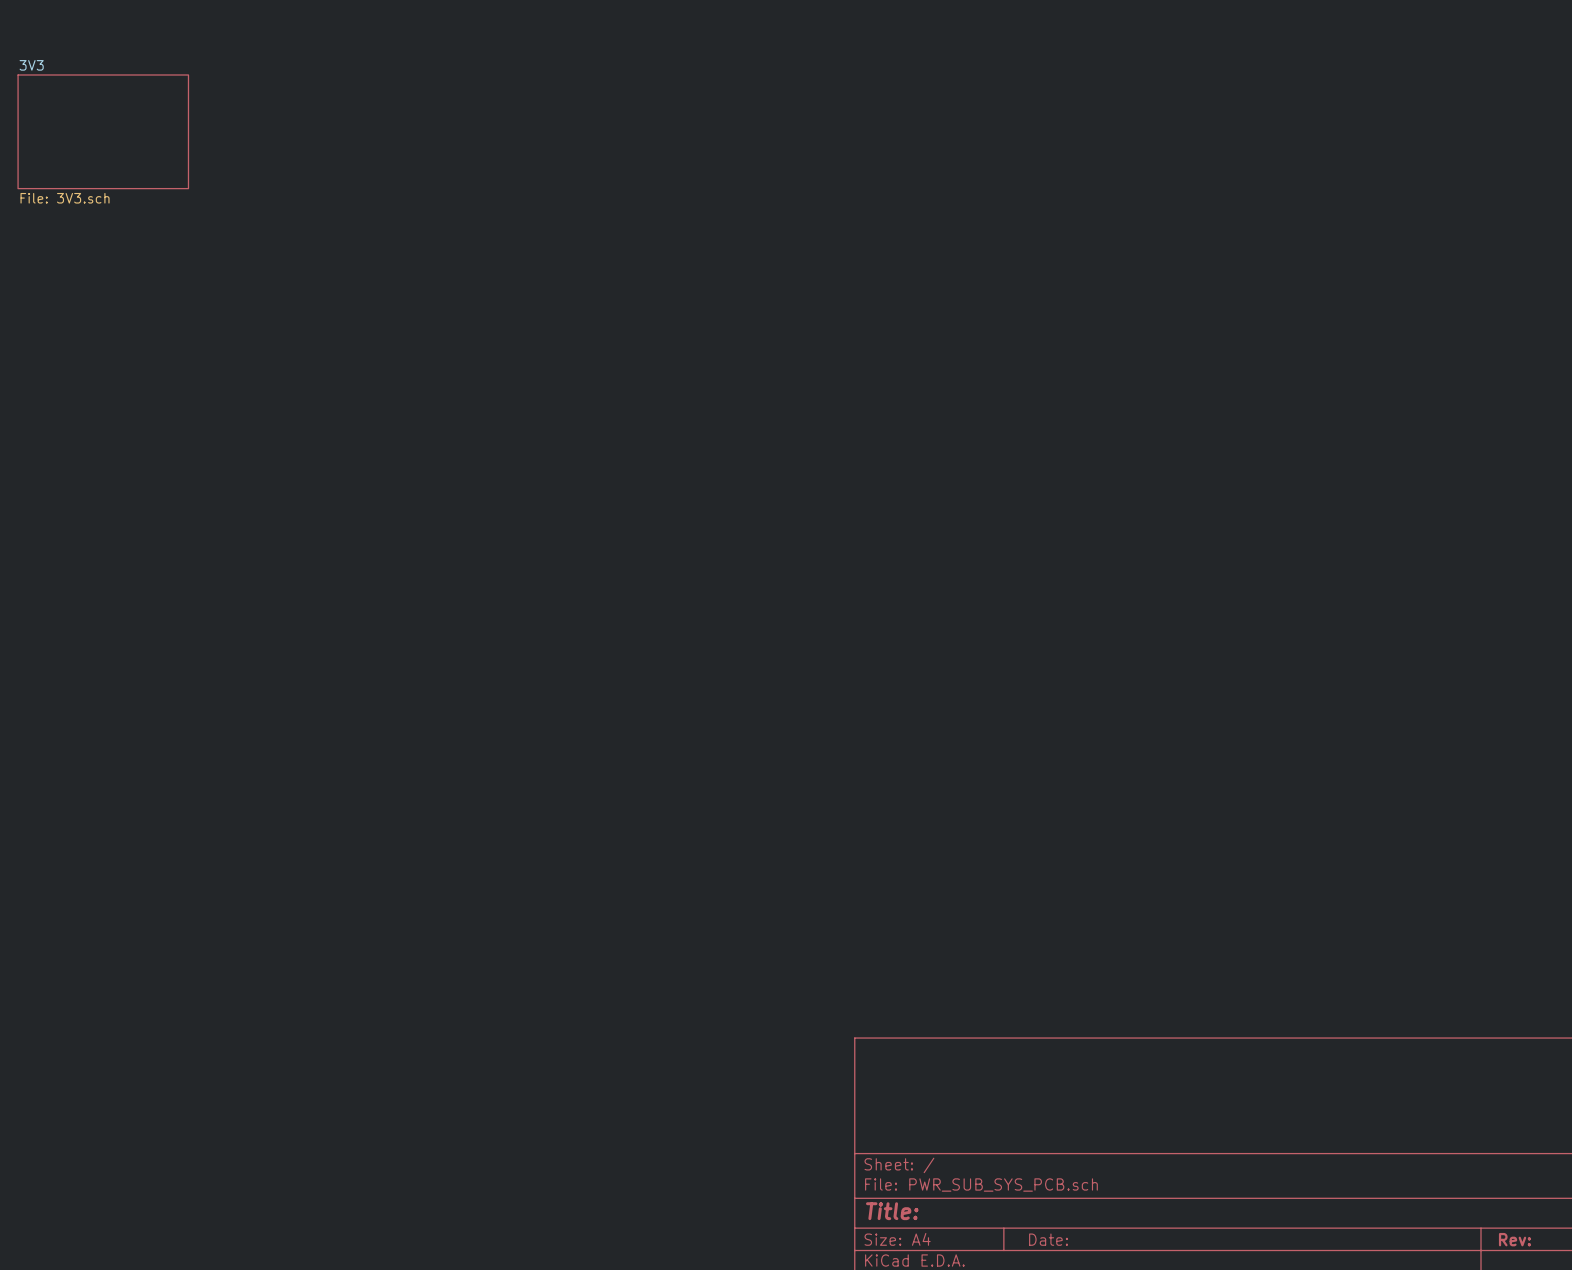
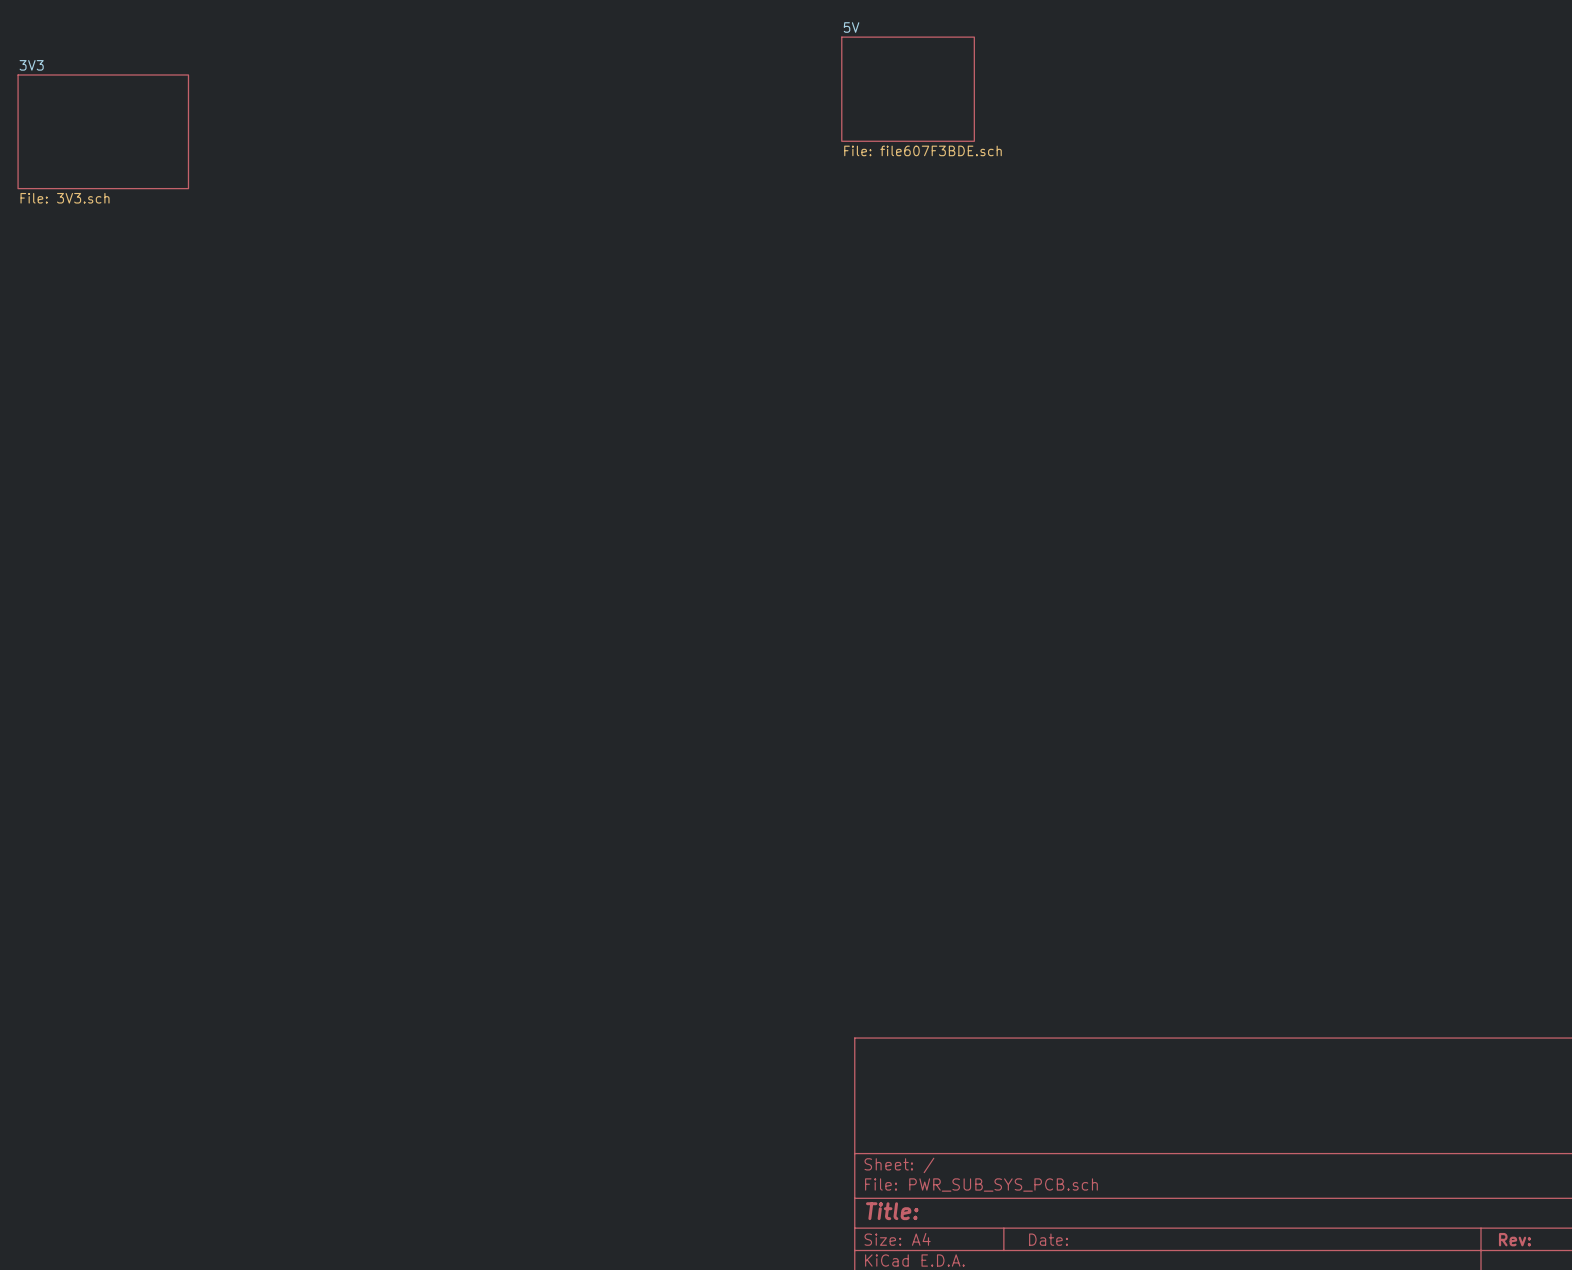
sheet 5V: none -> File: file607F3BDE.sch (908, 89)

